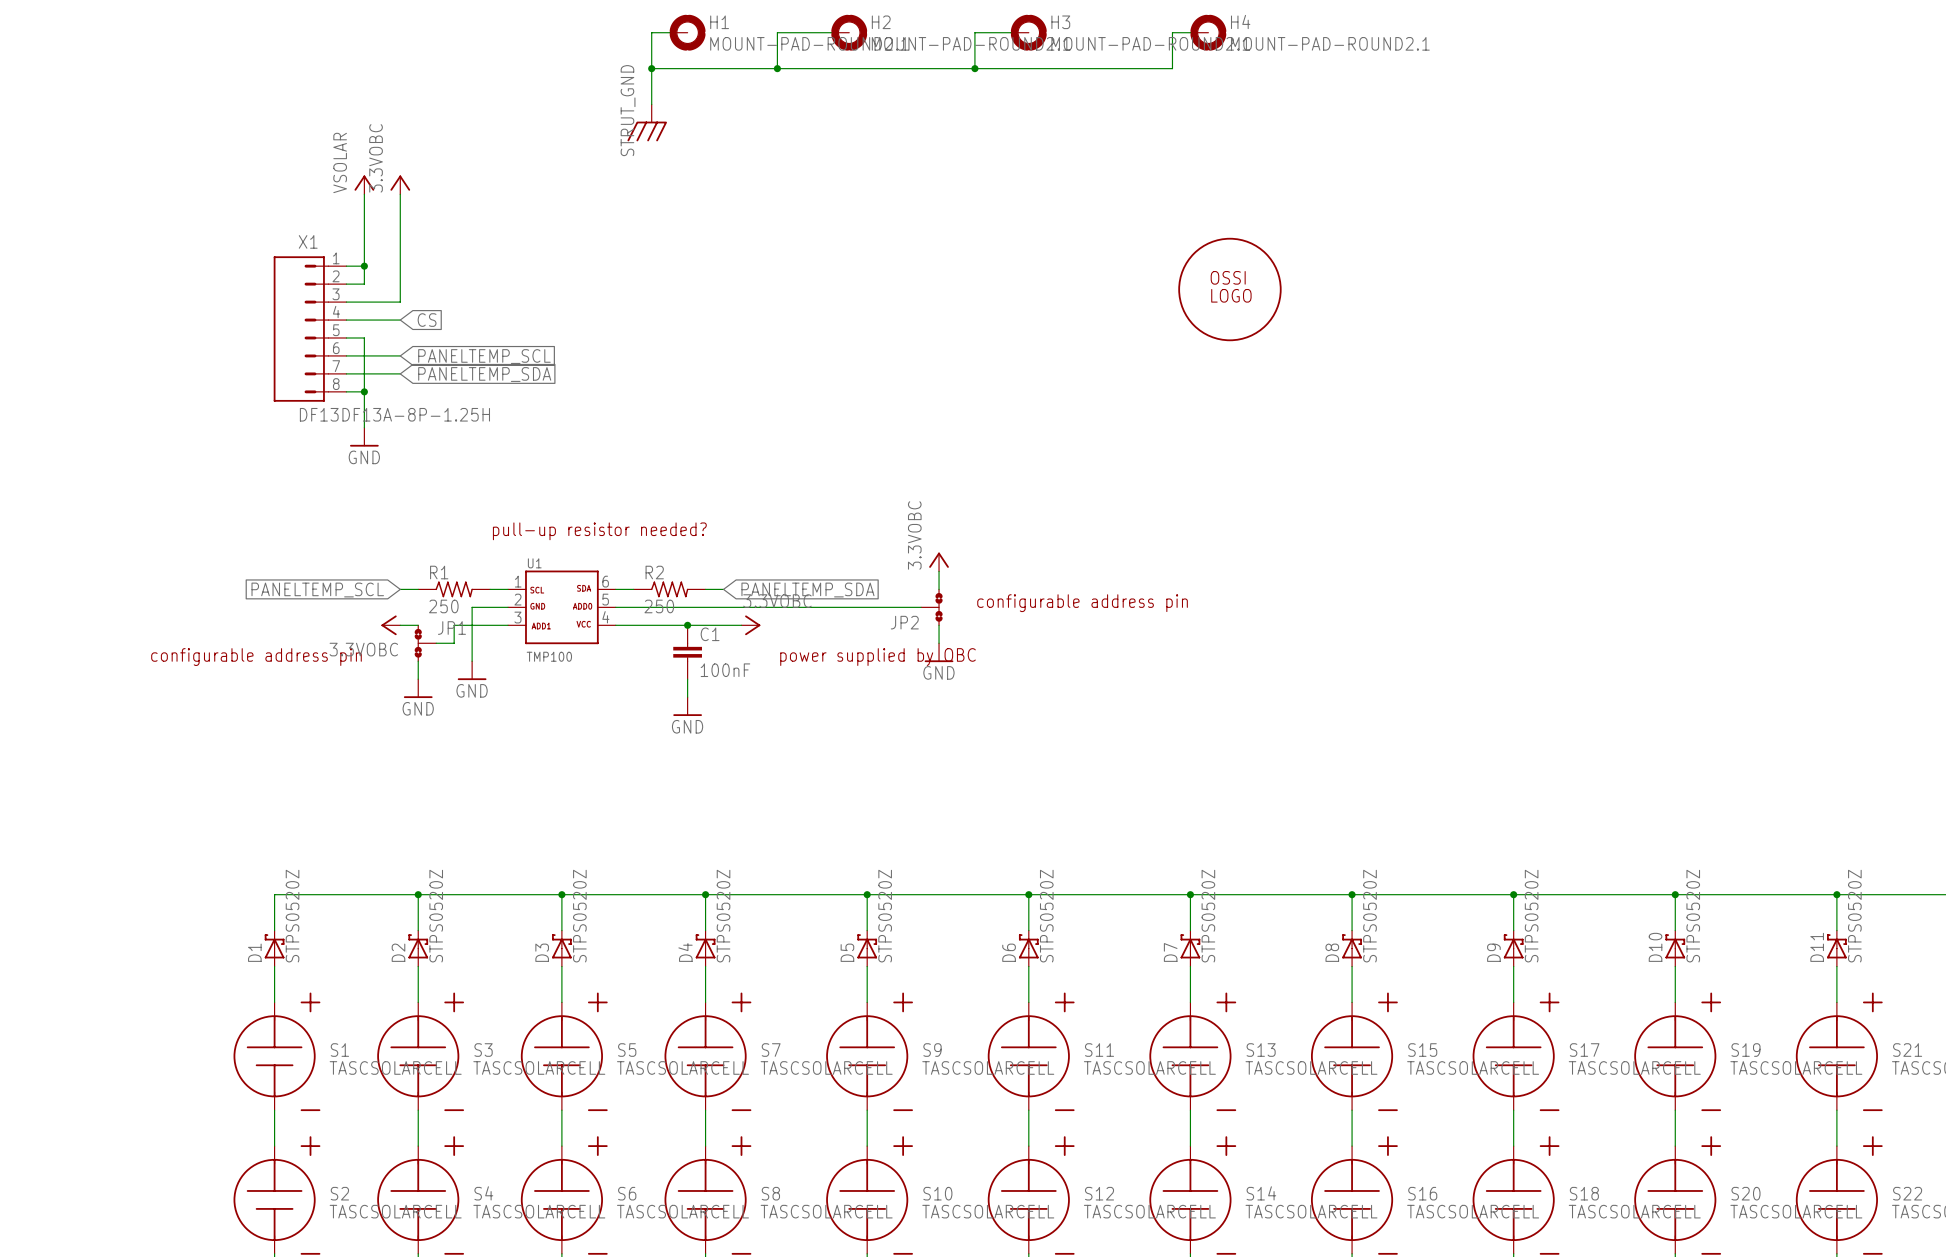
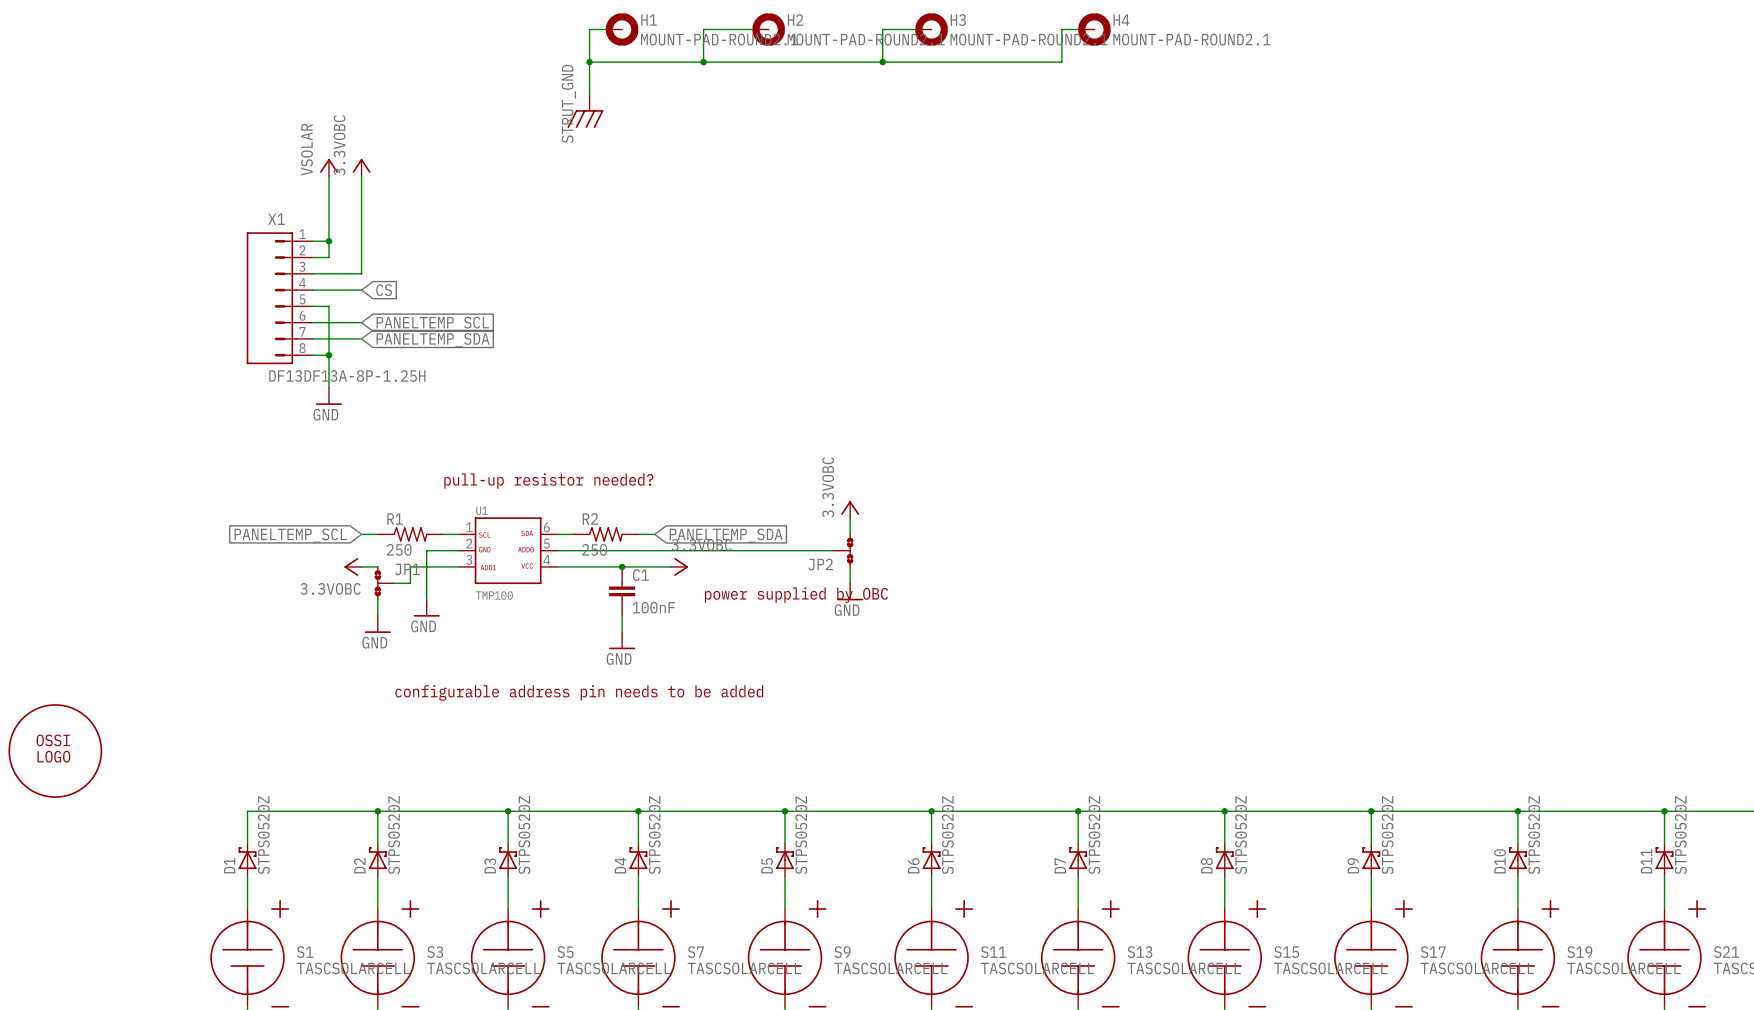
part: (1229, 289) -> none
text: configurable address pin (1082, 603) -> none
text: configurable address pin (256, 657) -> none
text: none -> configurable address pin needs to be added (579, 692)
part: none -> (55, 751)

